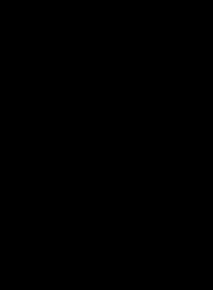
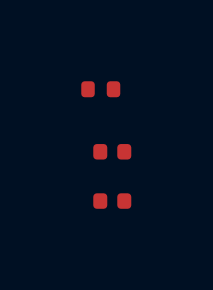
part: none -> (100, 89)
part: none -> (112, 151)
part: none -> (112, 201)

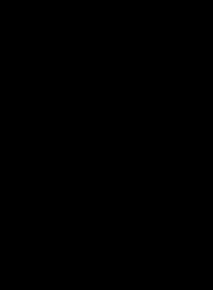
part: (100, 89) -> none
part: (112, 151) -> none
part: (112, 201) -> none

